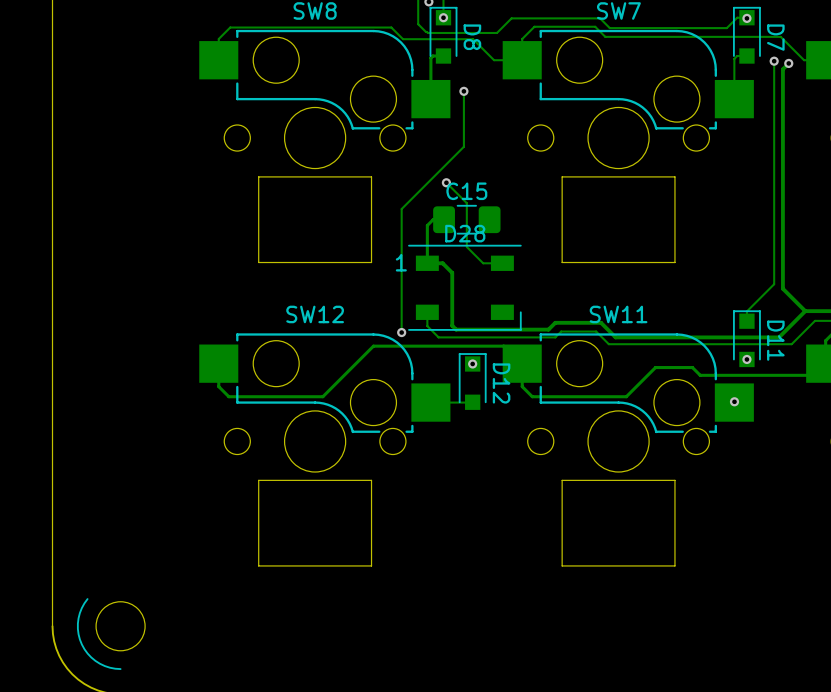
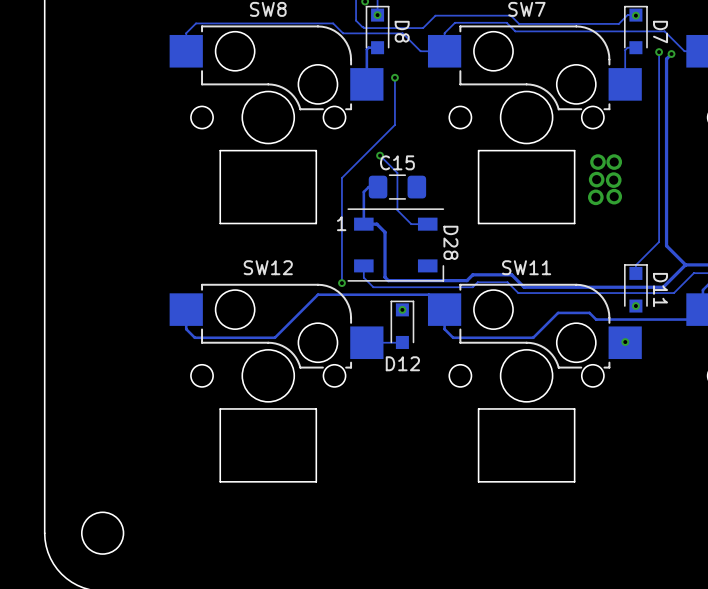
via: none -> (597, 162)
via: none -> (614, 162)
via: none -> (596, 179)
via: none -> (613, 180)
via: none -> (595, 197)
via: none -> (614, 196)
D28 name rotation: 0° (465, 233) -> 90° clockwise (450, 242)
D28 name position: D28 (465, 233) -> D28 (450, 242)
D12 name rotation: 0° (501, 383) -> 90° counterclockwise (402, 363)
line: (87, 599) (78, 618) (78, 634) (81, 644) (95, 660) (109, 667) (120, 669) -> none

